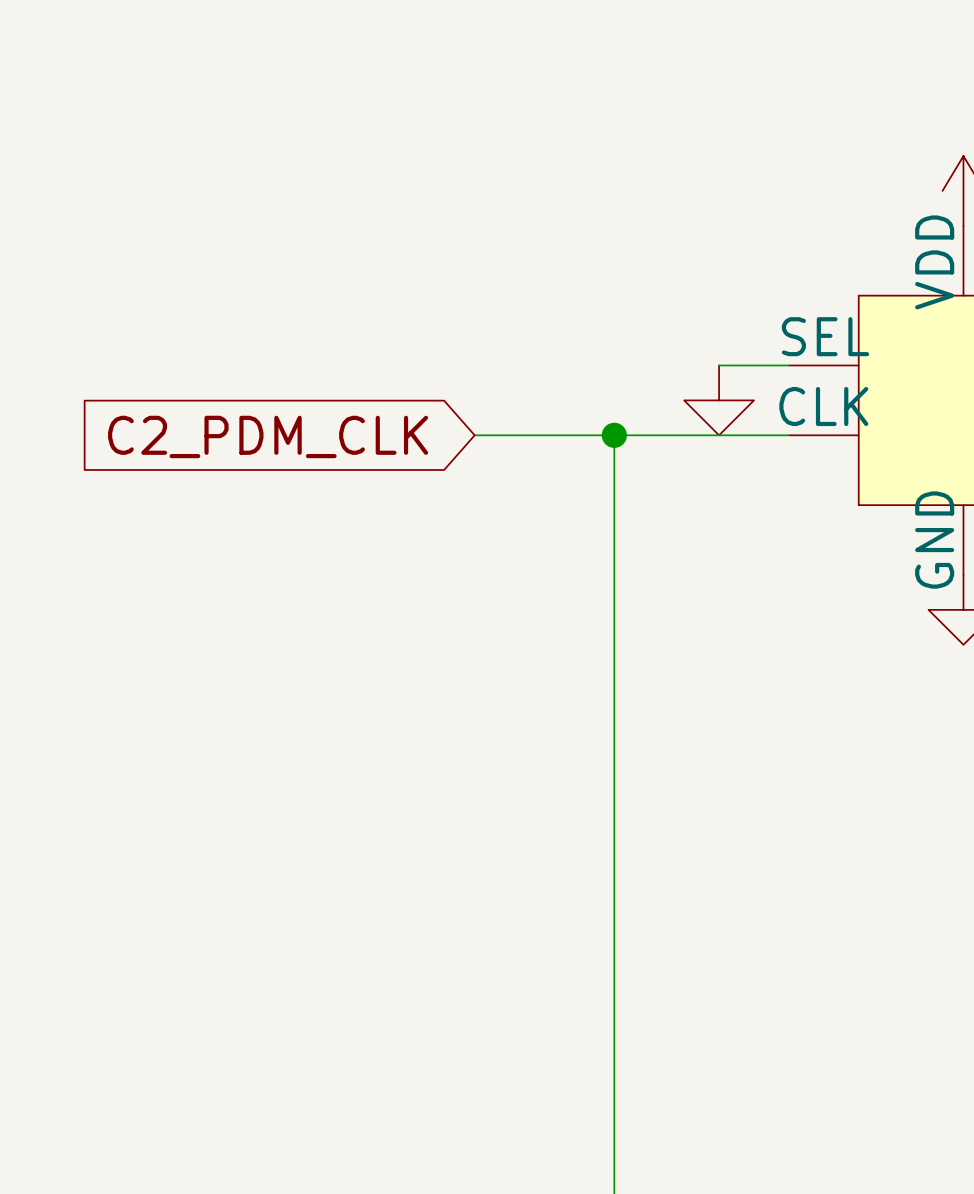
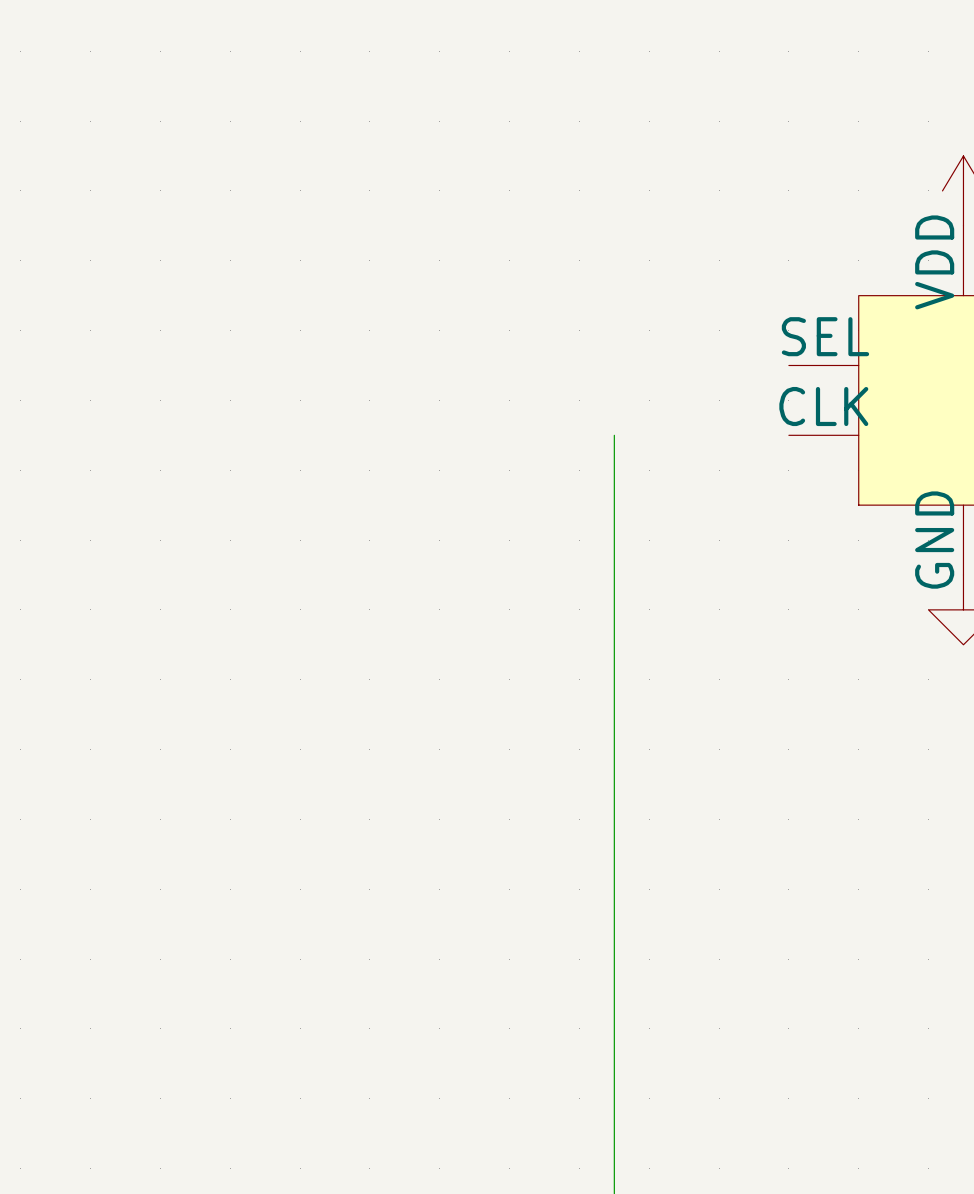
wire: (719, 365) (788, 365) -> none
power symbol: (719, 400) -> none
wire: (474, 435) (788, 435) -> none
junction: (614, 435) -> none
global label: C2_PDM_CLK (268, 436) -> none

